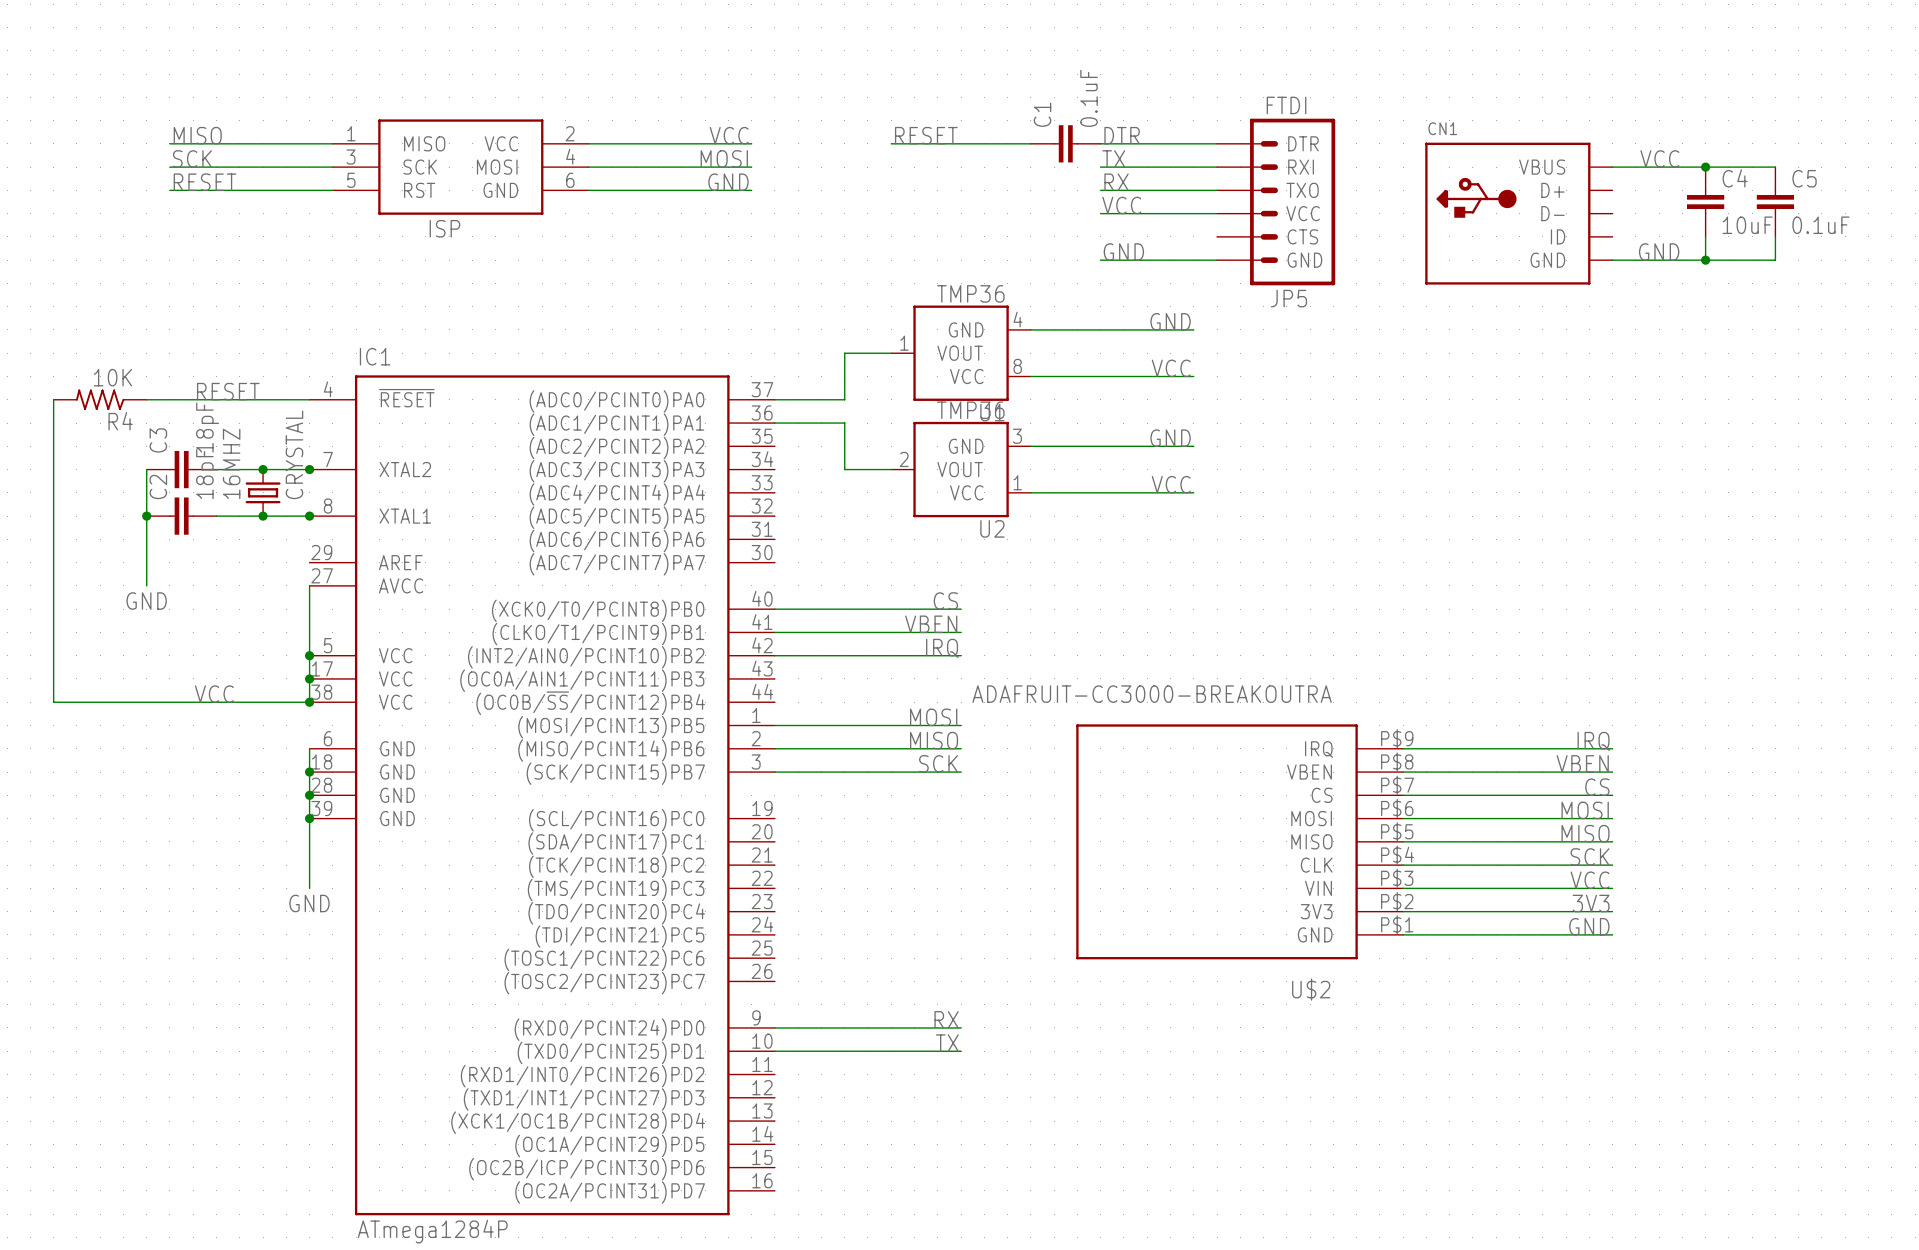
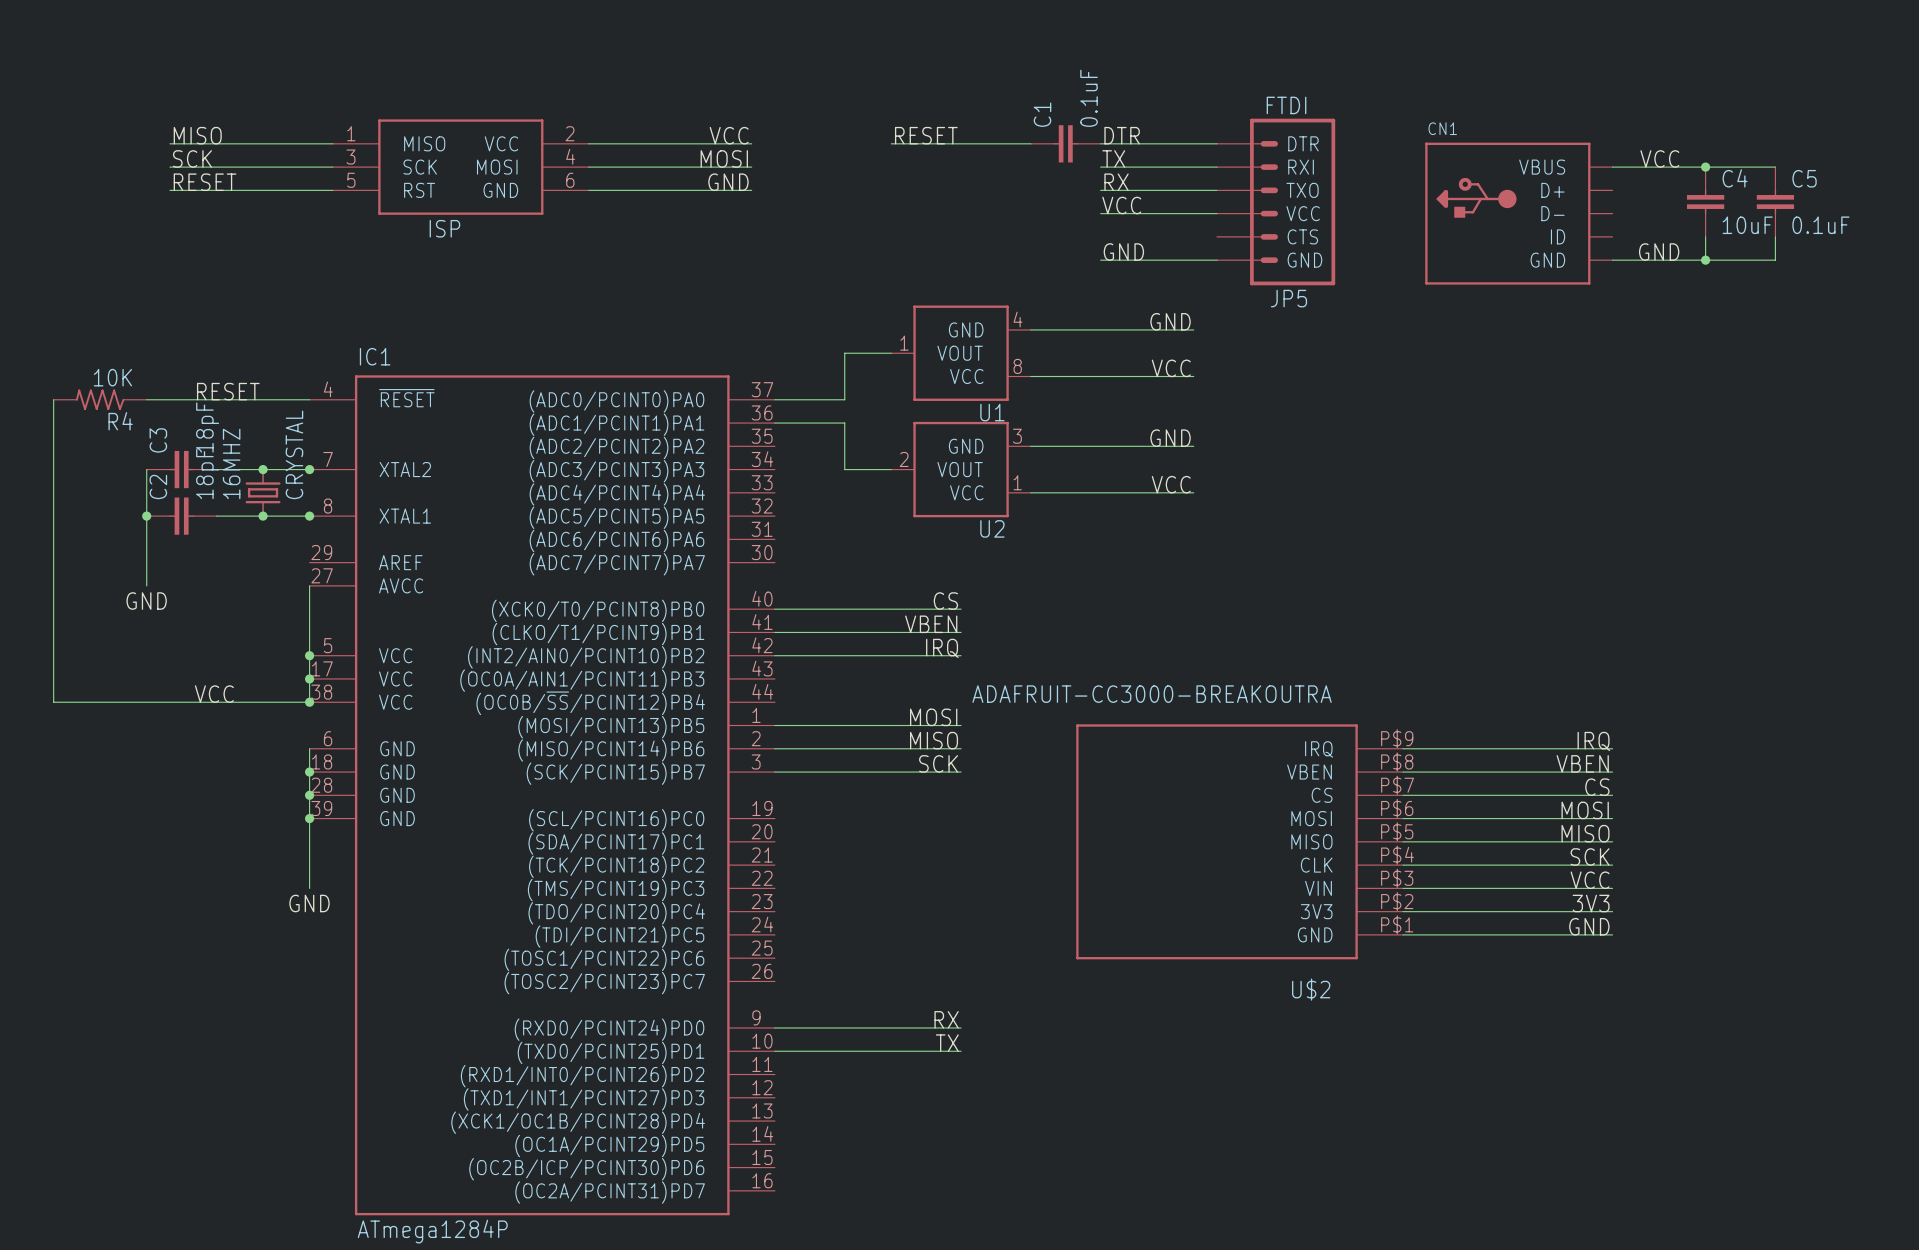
U1 value: TMP36 (970, 293) -> none
U2 value: TMP36 (970, 410) -> none

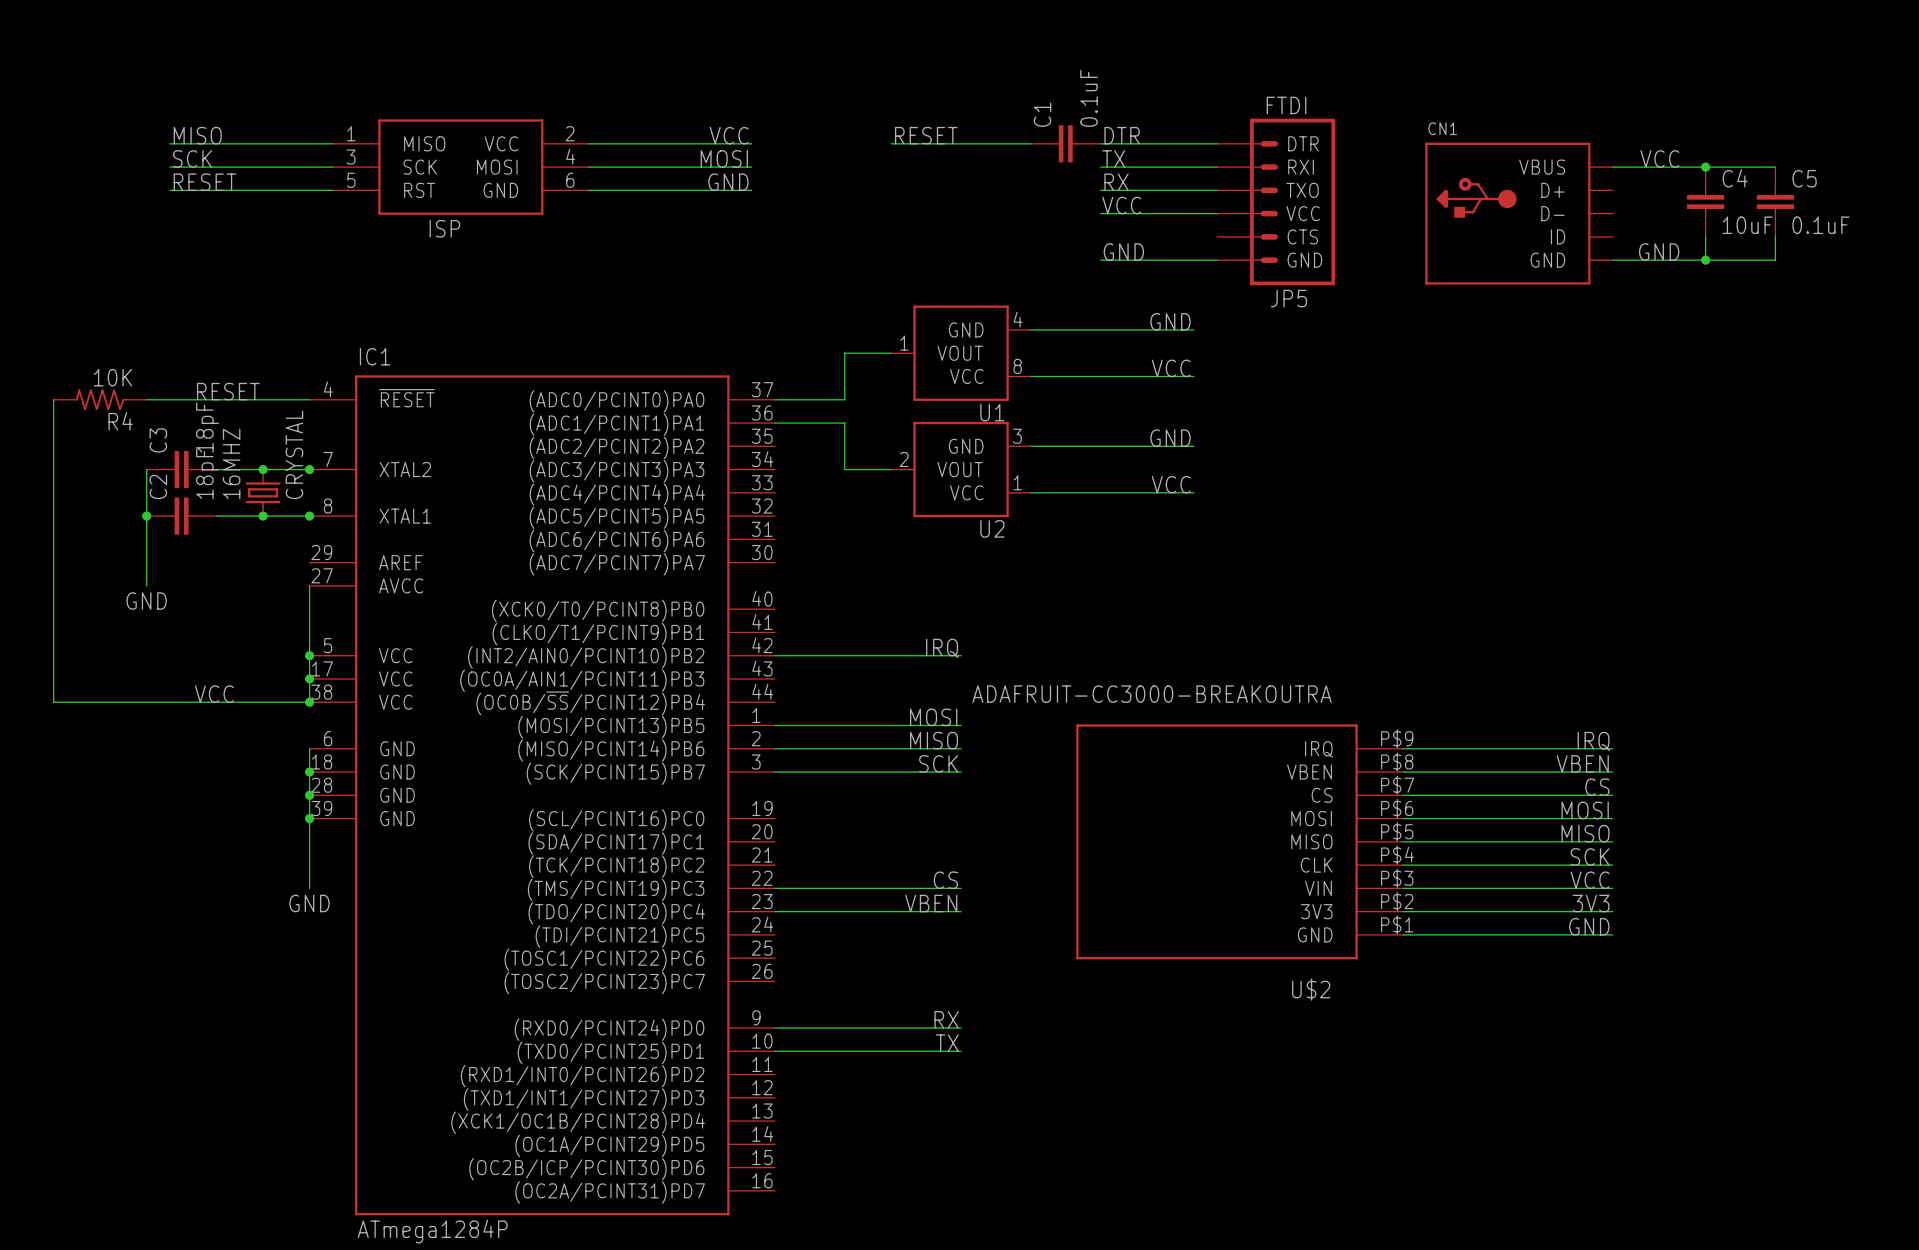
label: CS (945, 601) -> none
wire: (774, 609) (961, 609) -> none
label: VBEN (931, 624) -> none
wire: (774, 632) (961, 632) -> none
label: none -> CS (945, 880)
wire: none -> (774, 888) (961, 888)
label: none -> VBEN (931, 903)
wire: none -> (774, 911) (961, 911)

